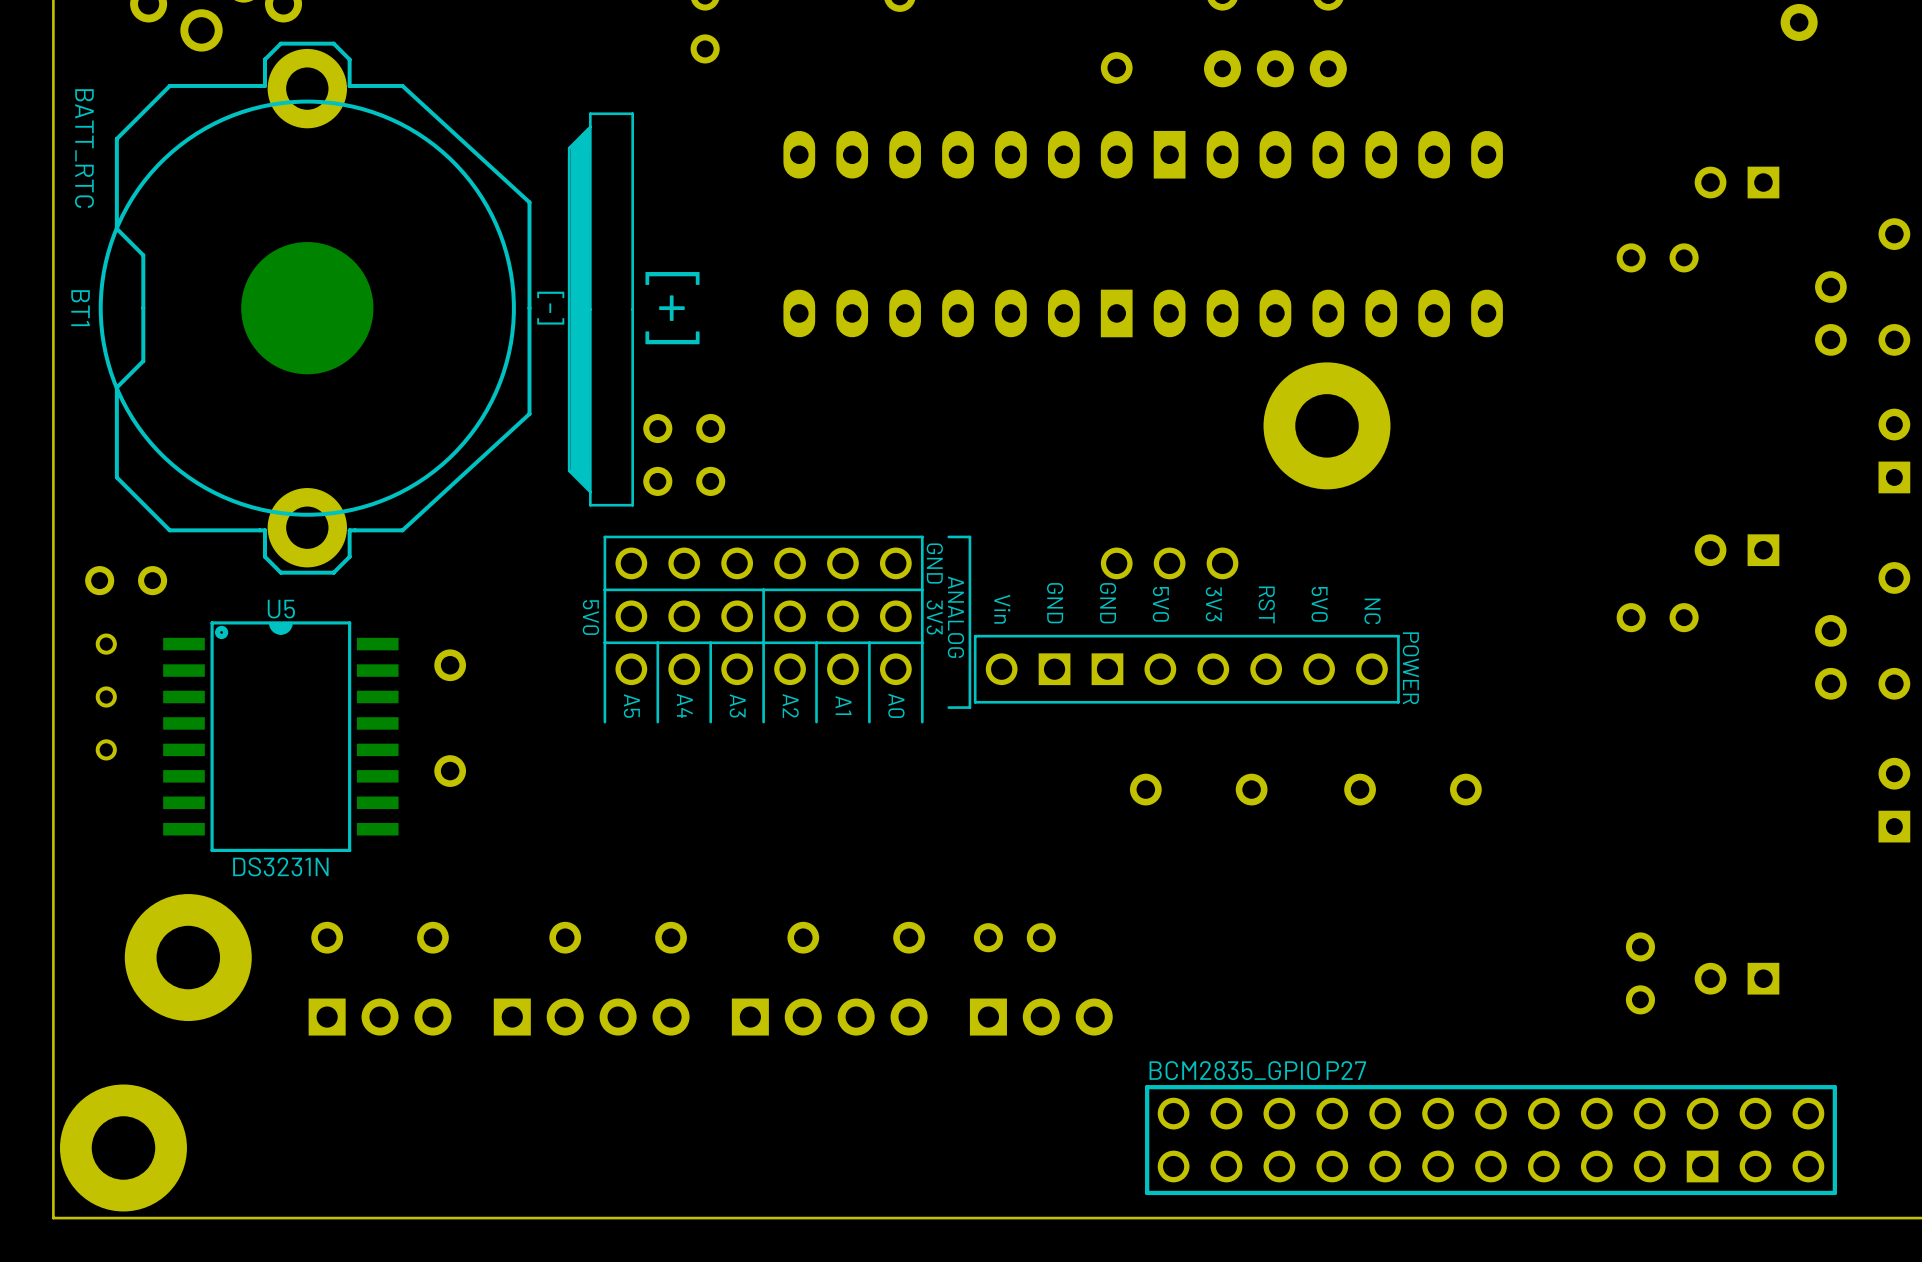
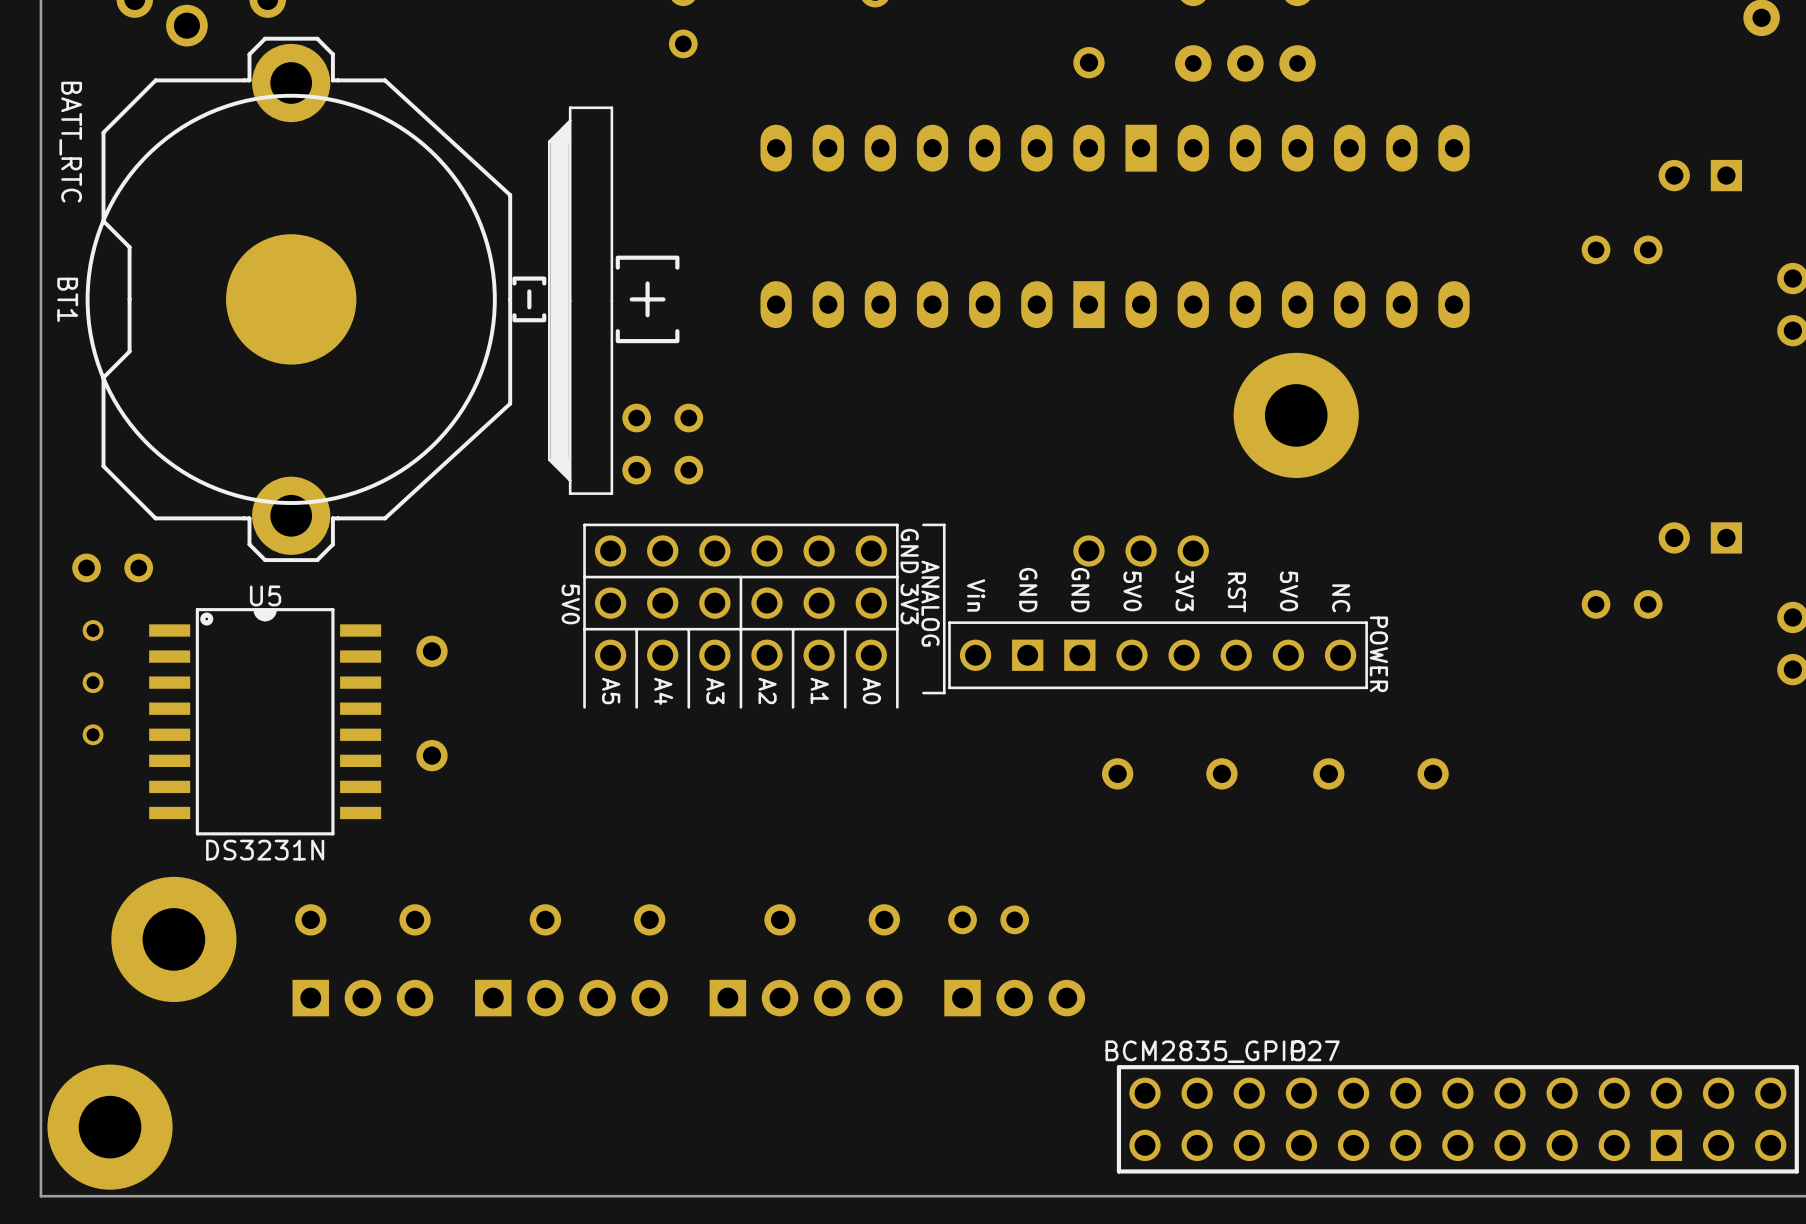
part: (1640, 973) -> none
part: (1737, 978) -> none

